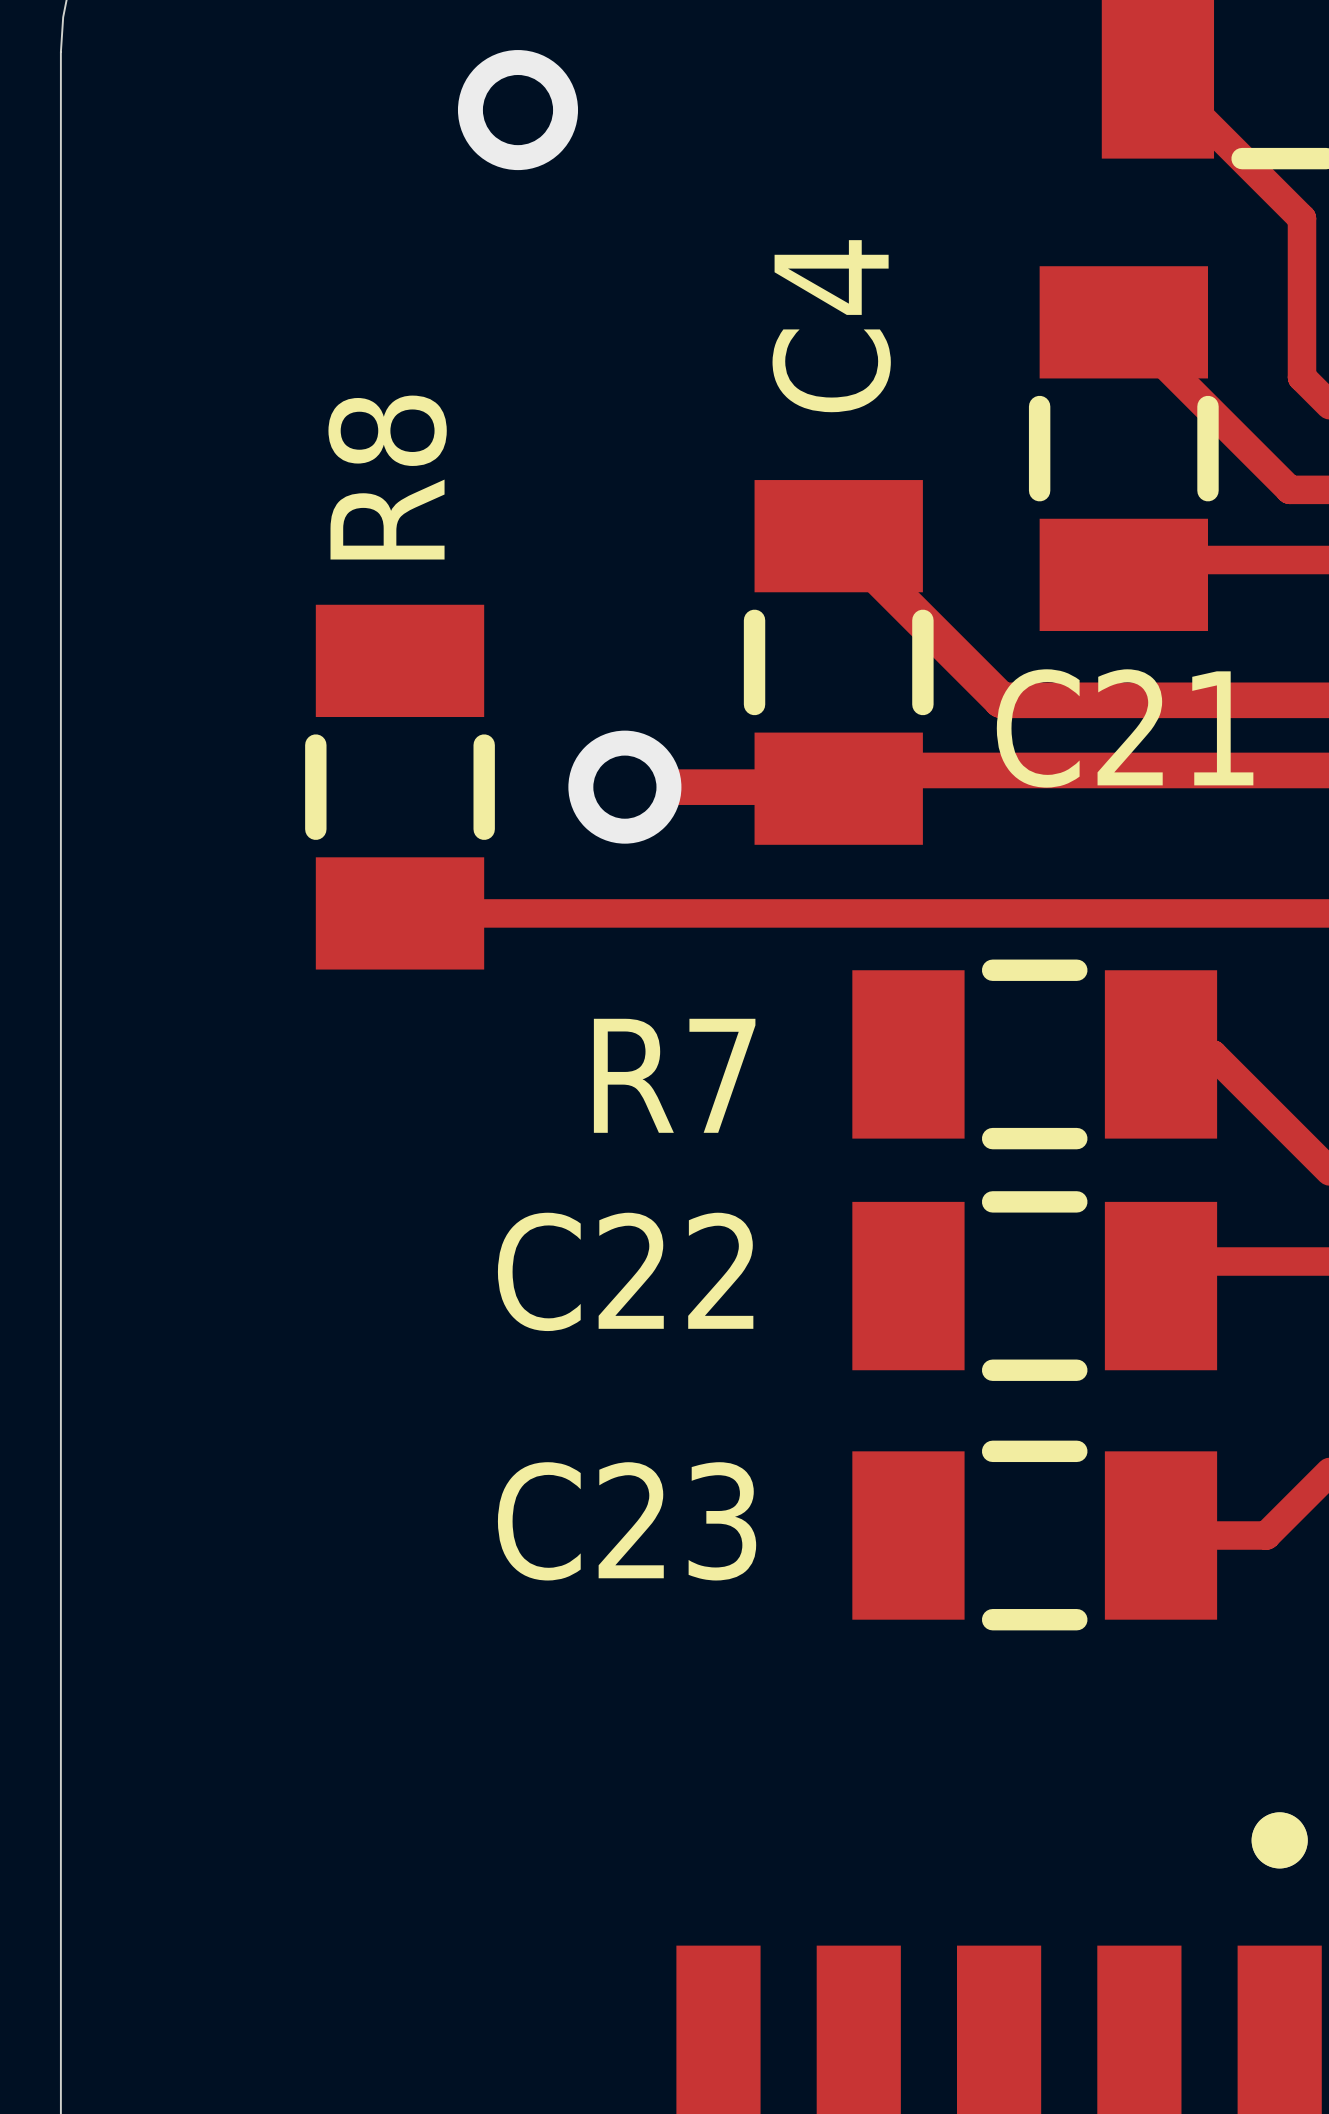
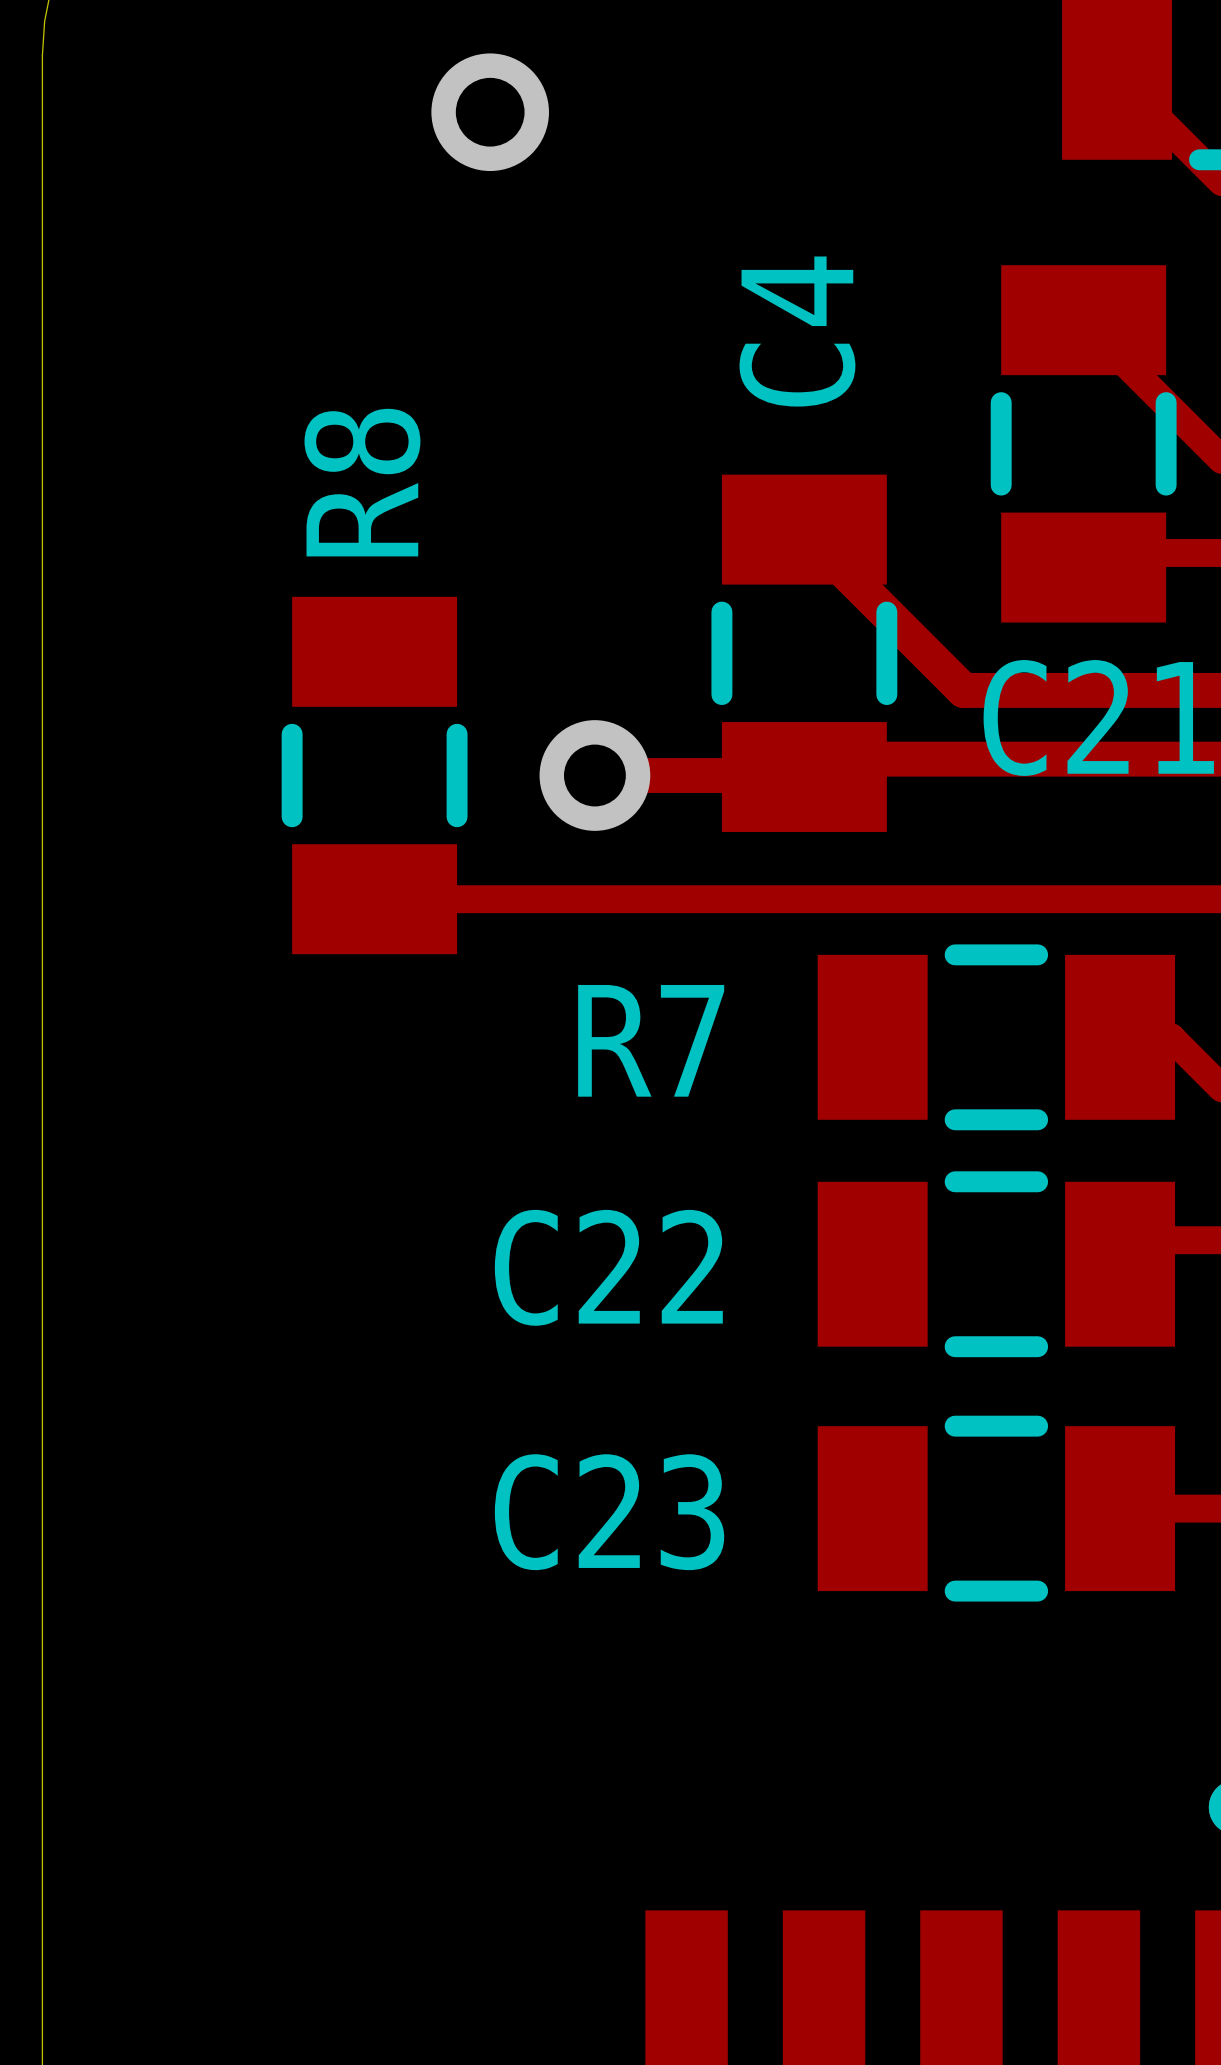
R7 name position: R7 (674, 1075) -> R7 (651, 1040)
C22 name position: C22 (625, 1271) -> C22 (608, 1267)
C23 name position: C23 (627, 1521) -> C23 (609, 1512)

